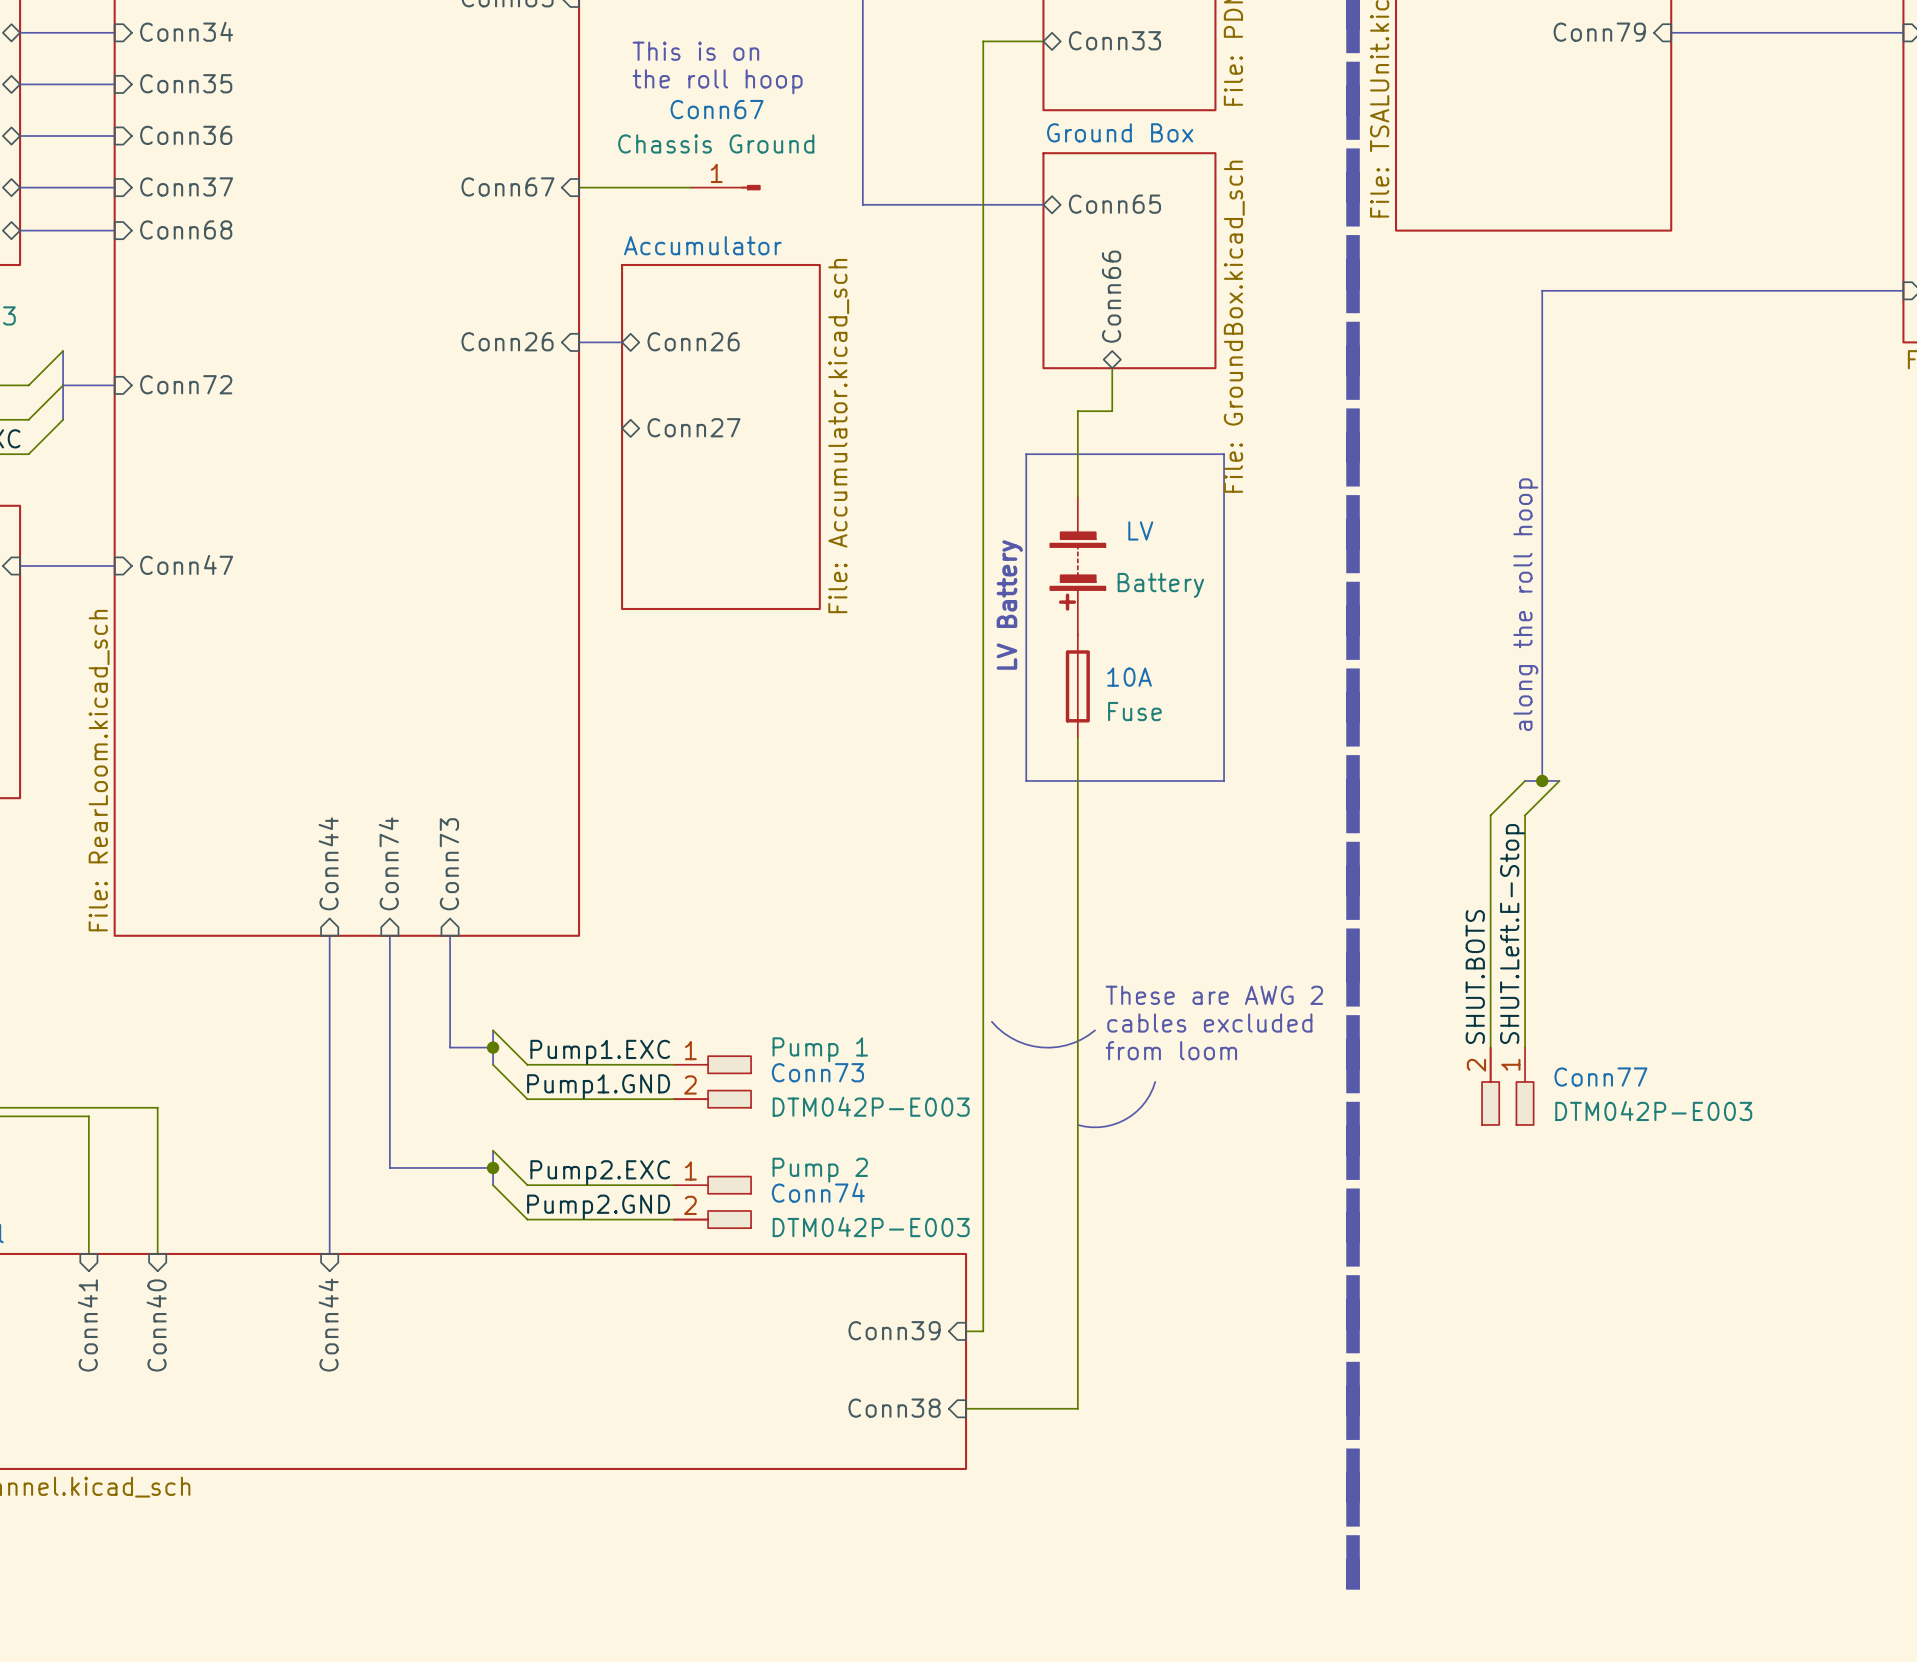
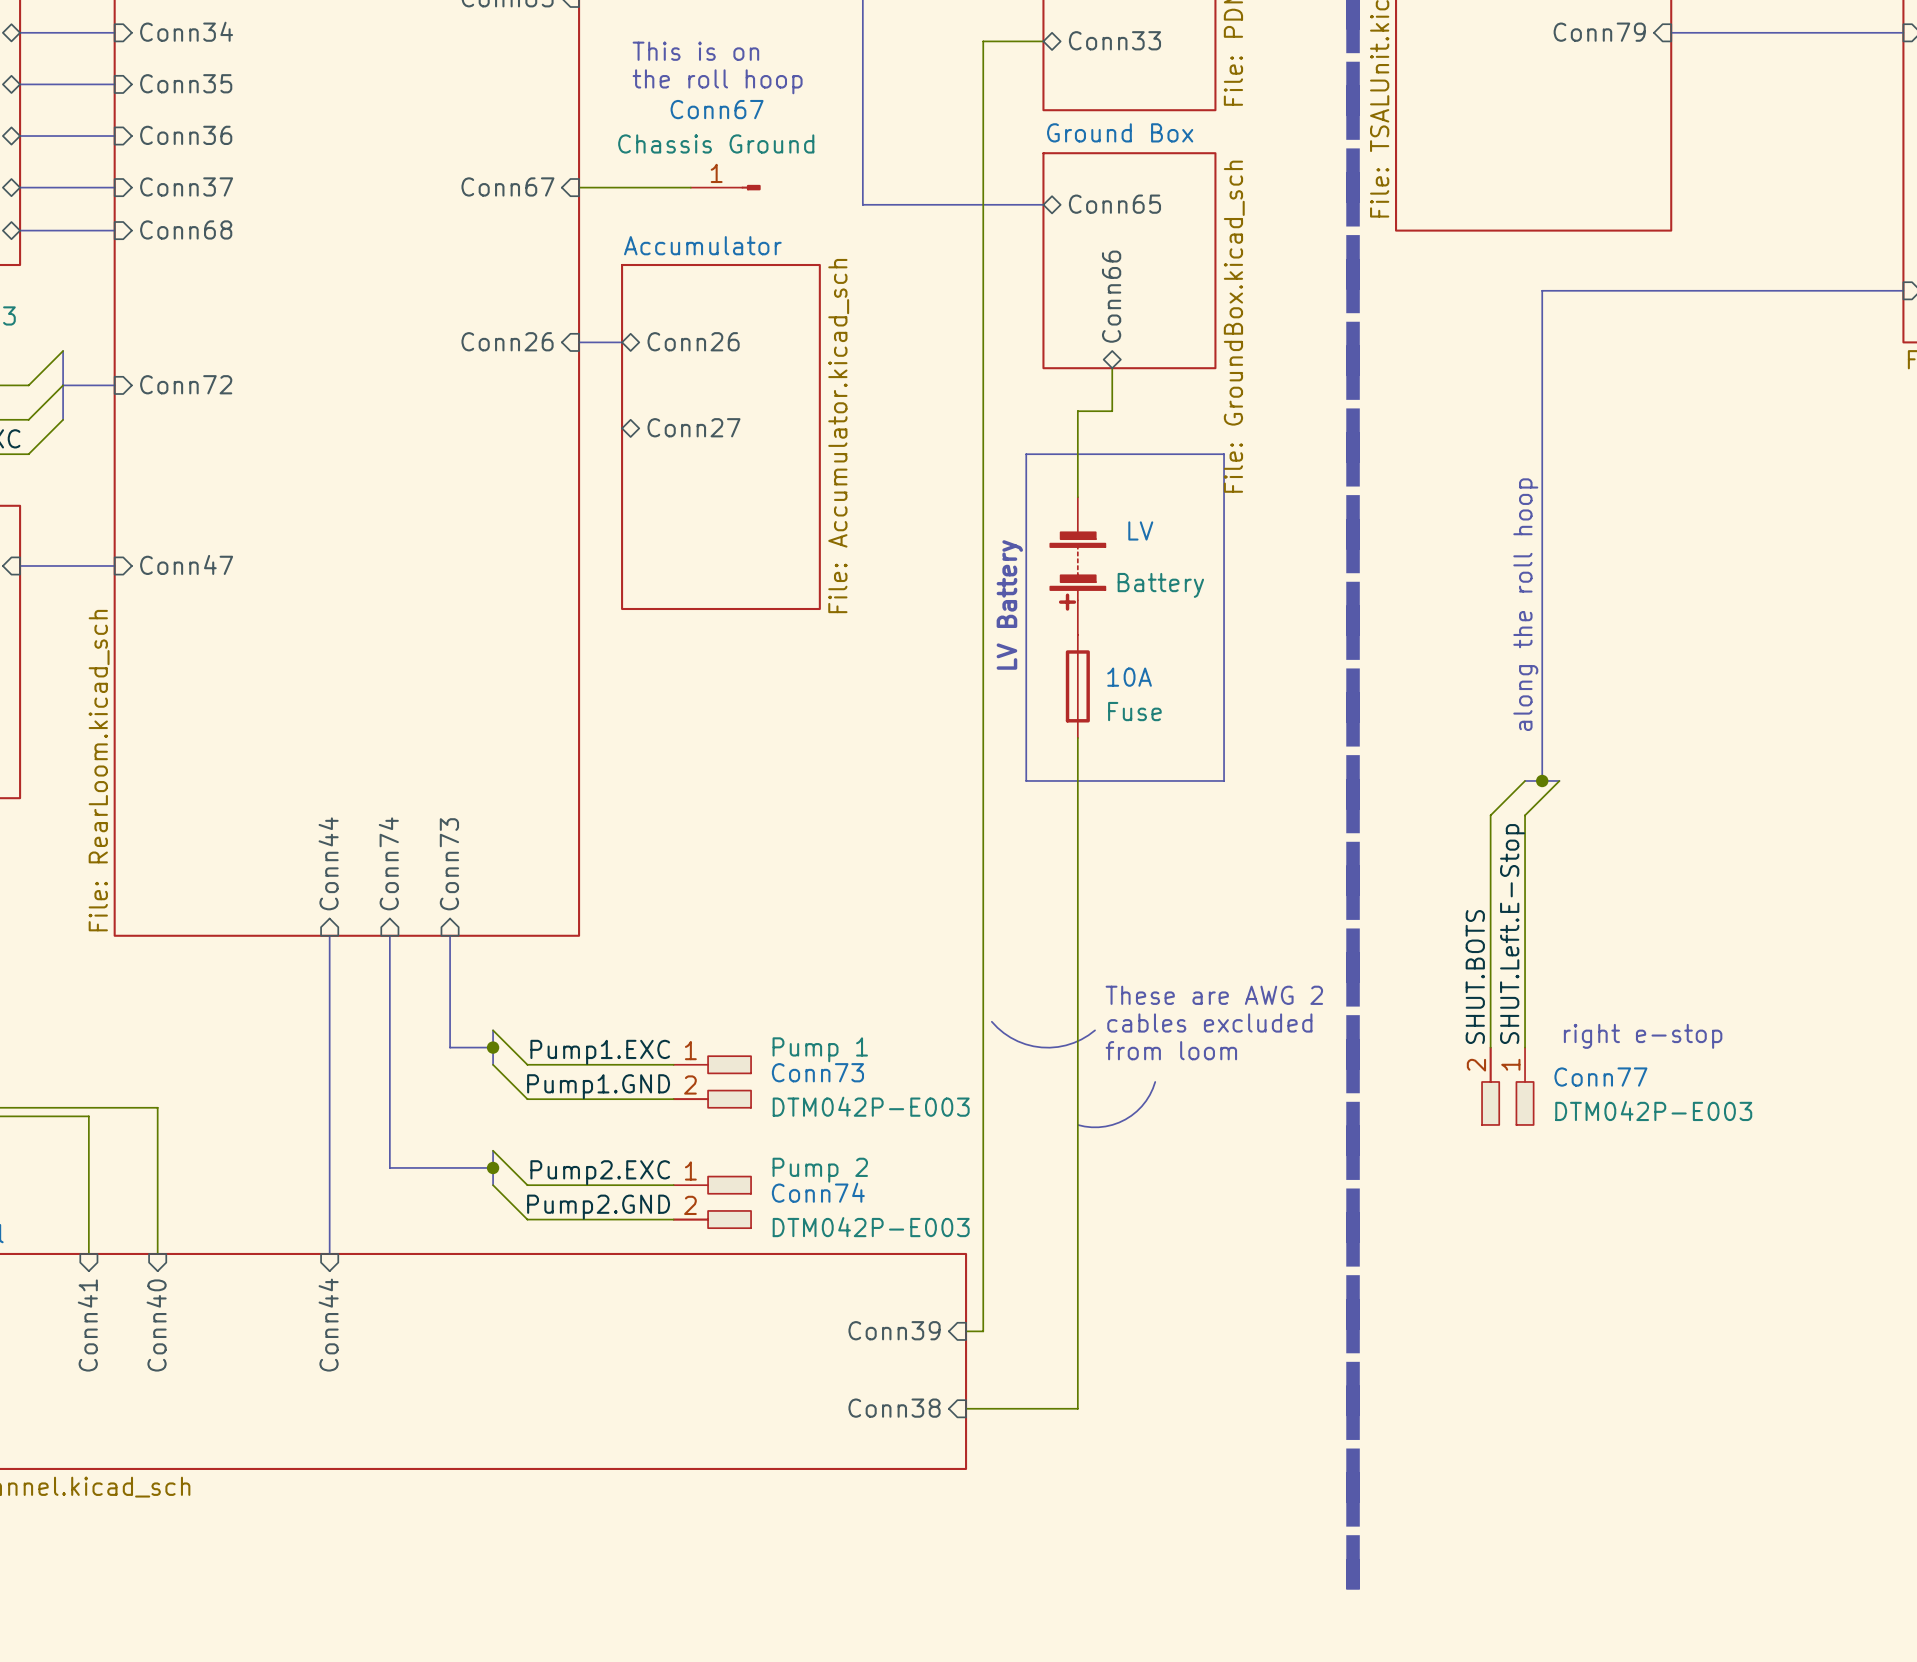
text: none -> right e-stop (1643, 1036)

